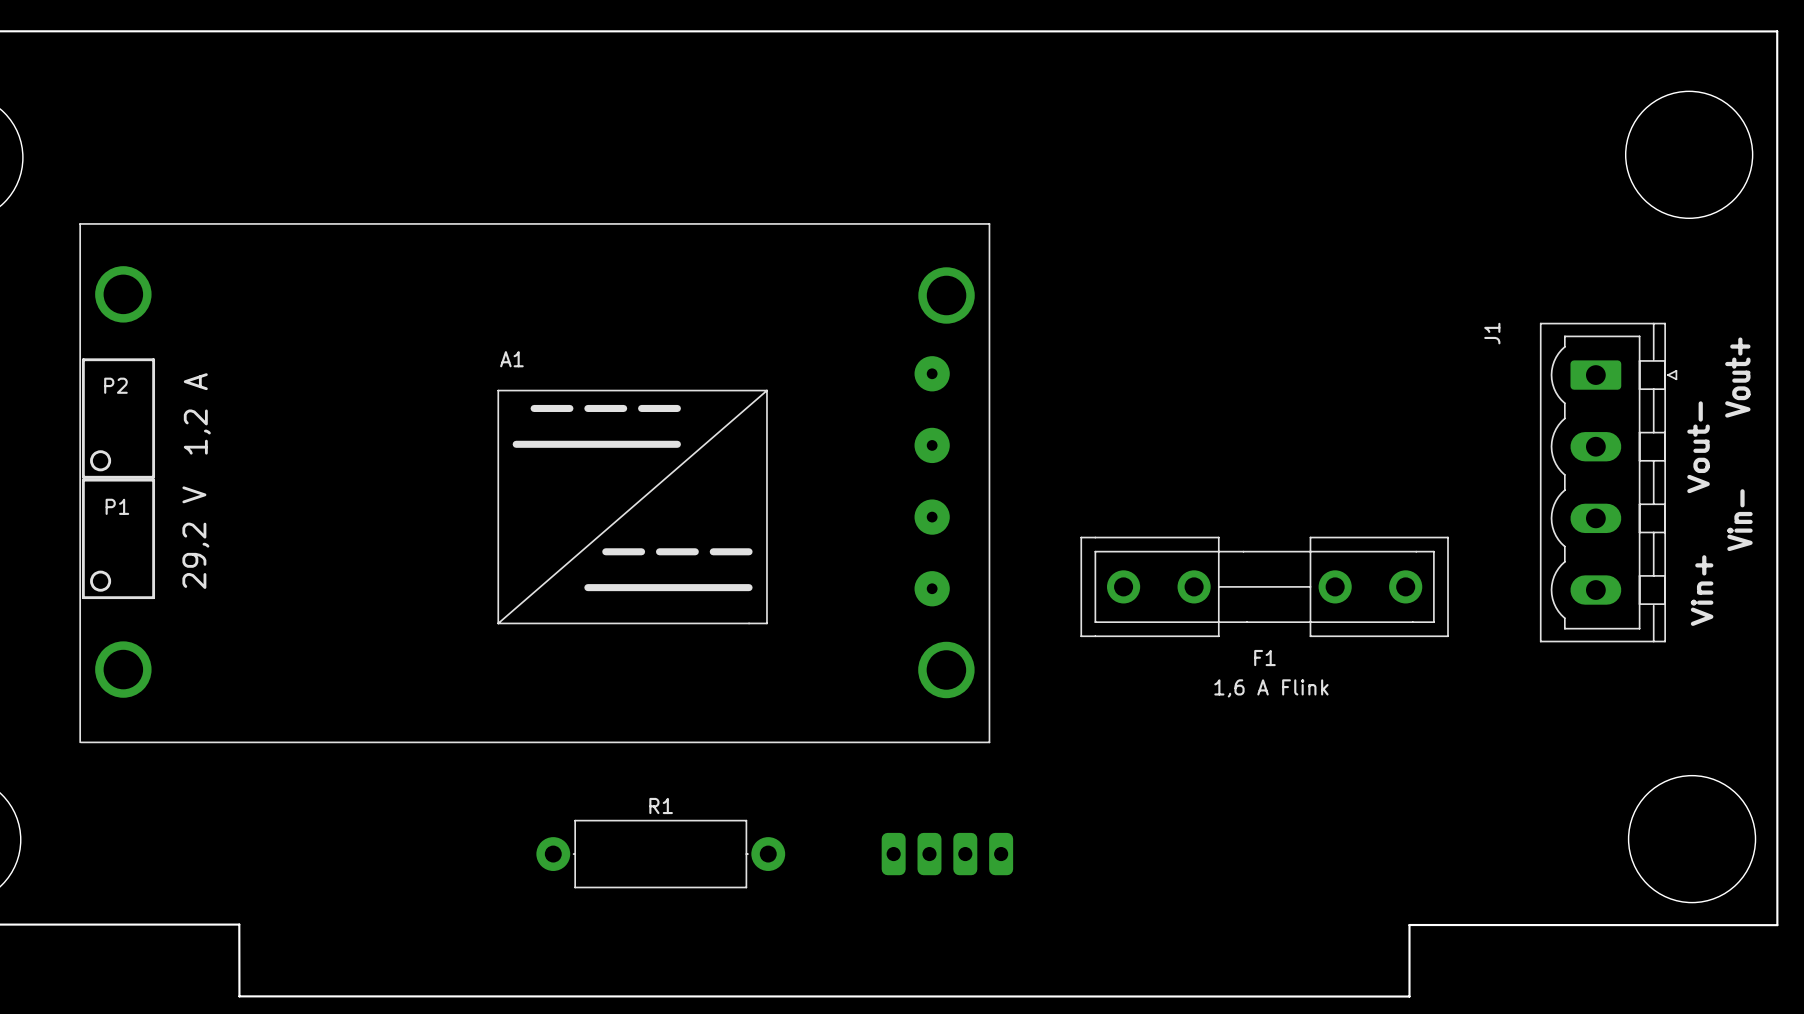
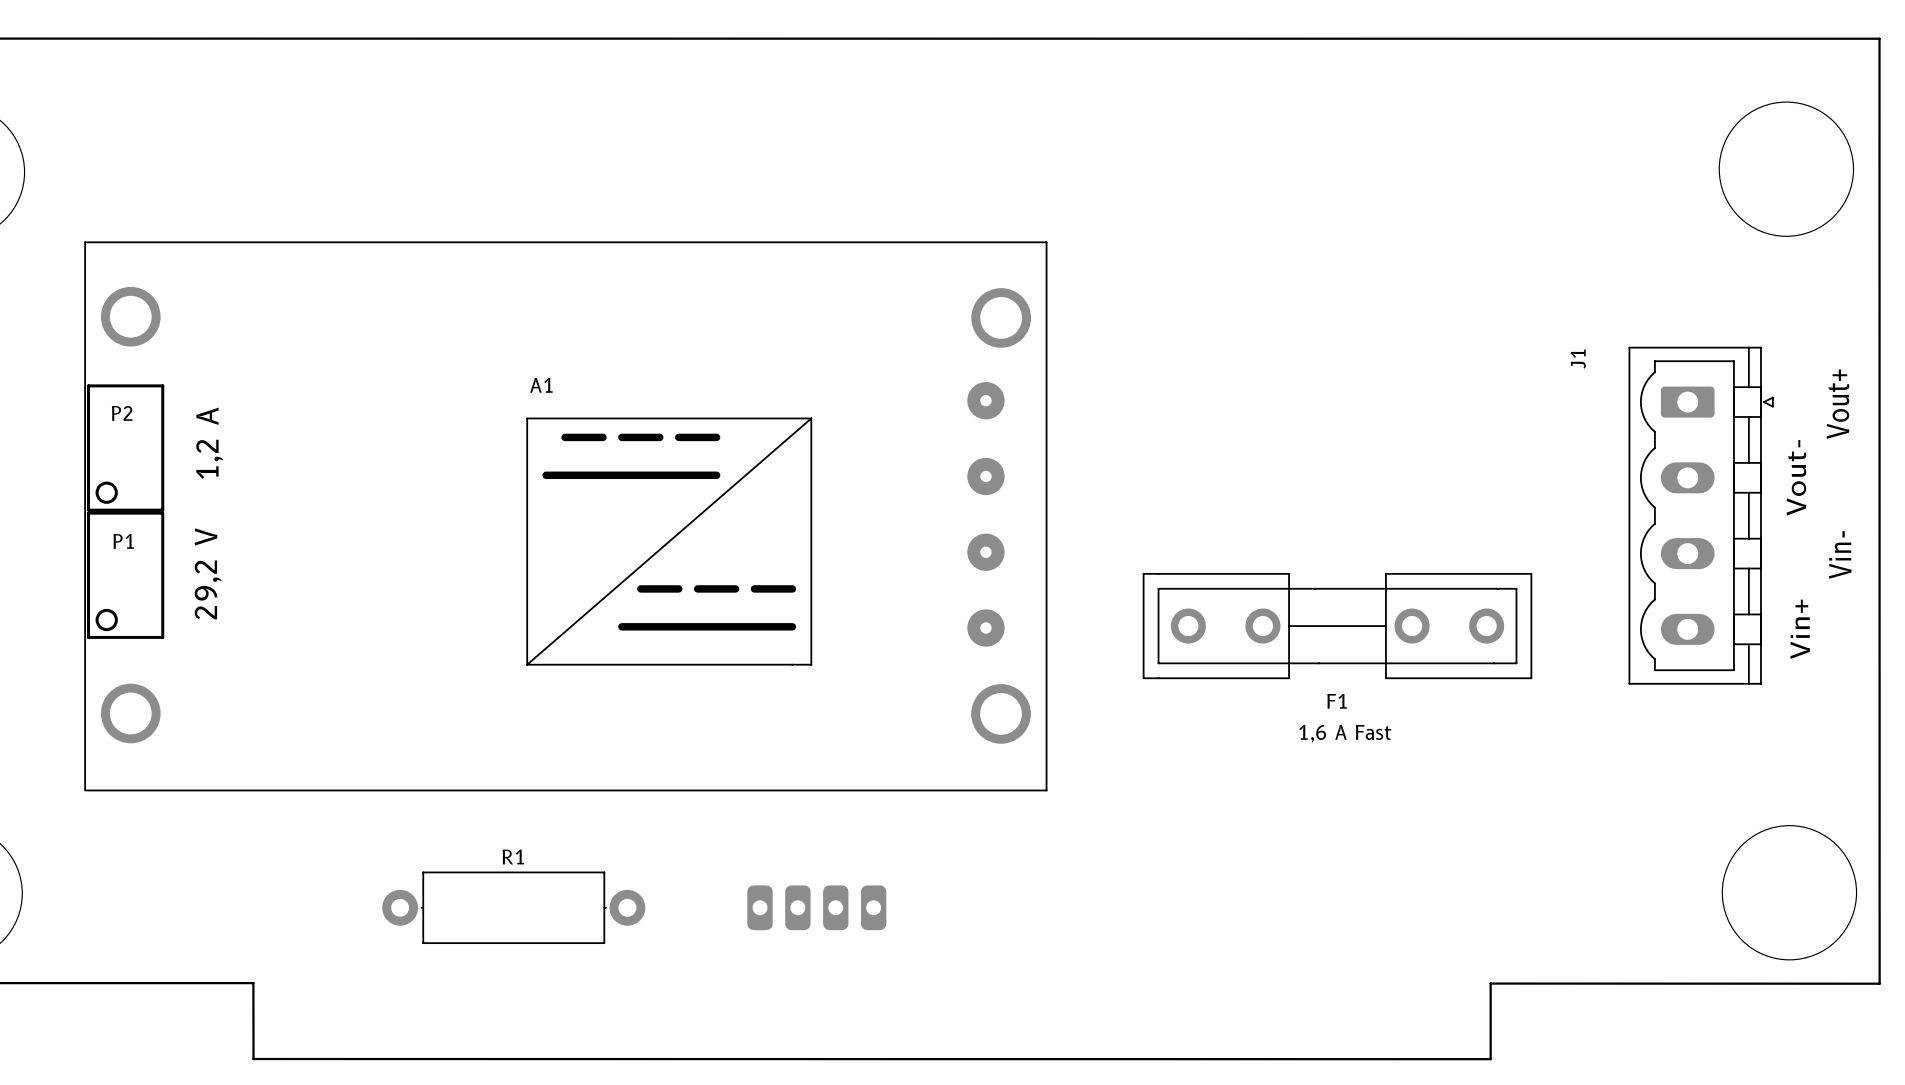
F1 value: 1,6 A Flink (1271, 688) -> 1,6 A Fast (1345, 733)
R1 position: (660, 854) -> (513, 907)
part position: (947, 854) -> (816, 907)

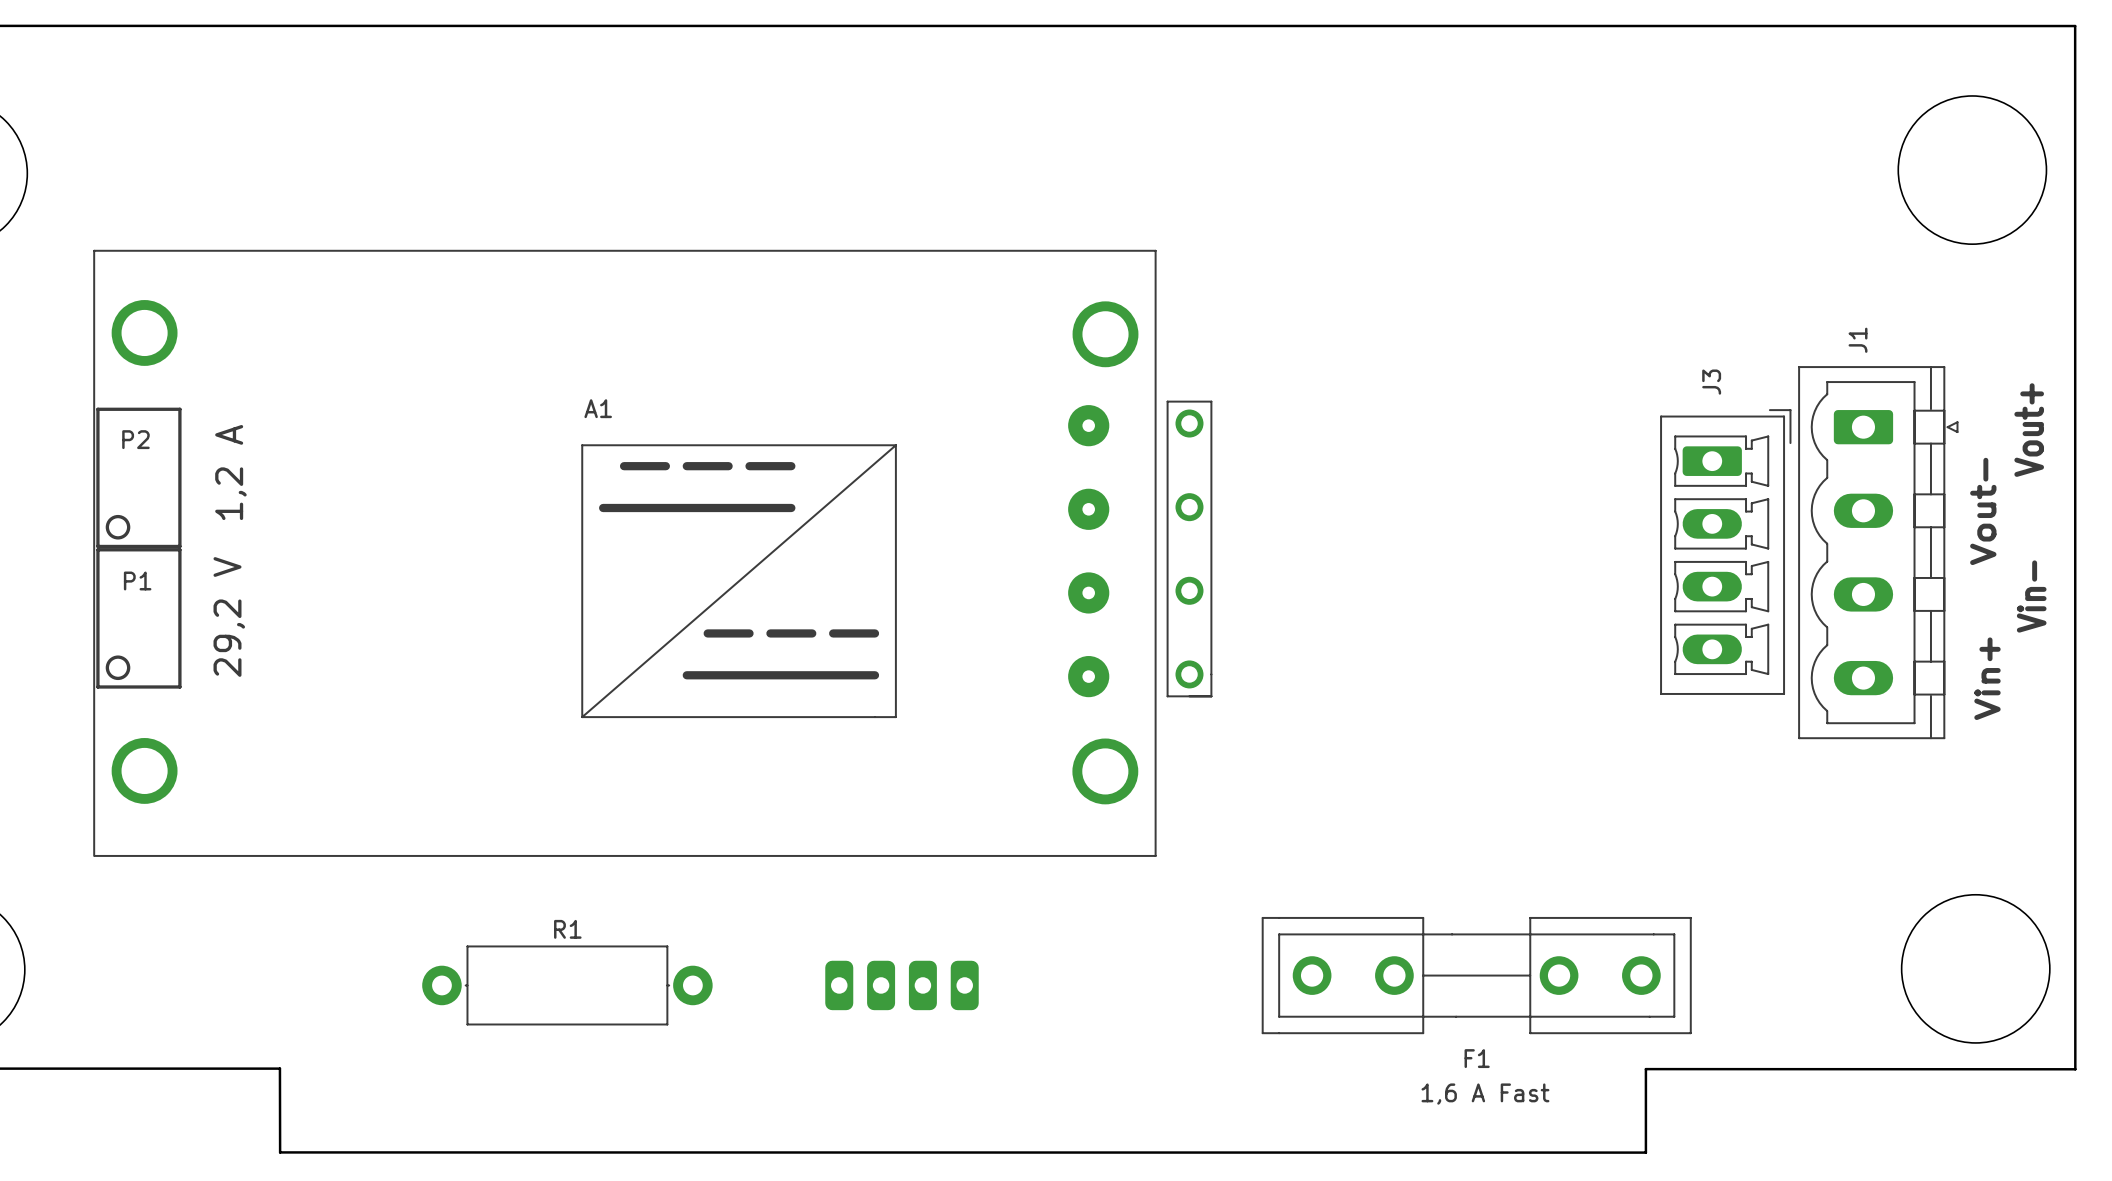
J1 name position: J1 (1578, 359) -> J1 (1858, 340)
part: none -> (1189, 548)
J3: none -> (1725, 552)
F1 position: (1337, 626) -> (1476, 975)

